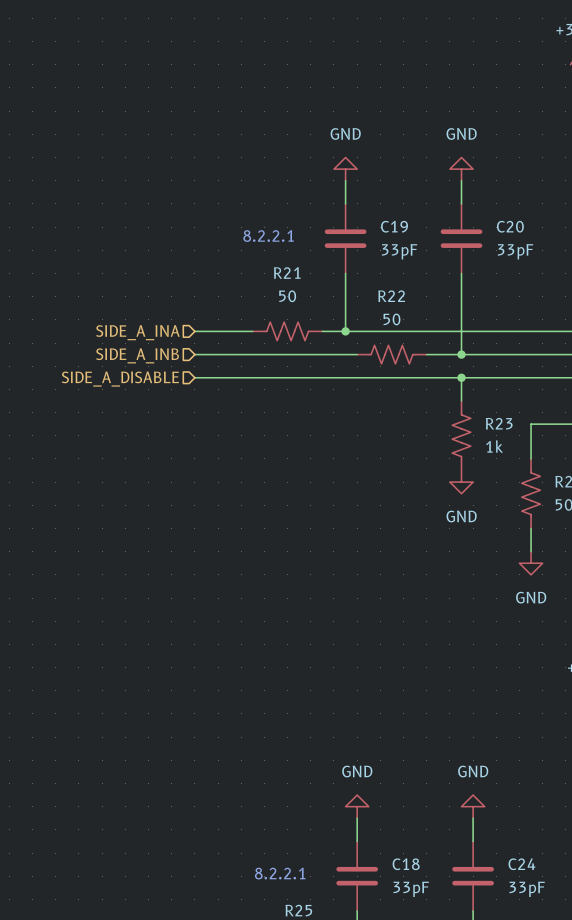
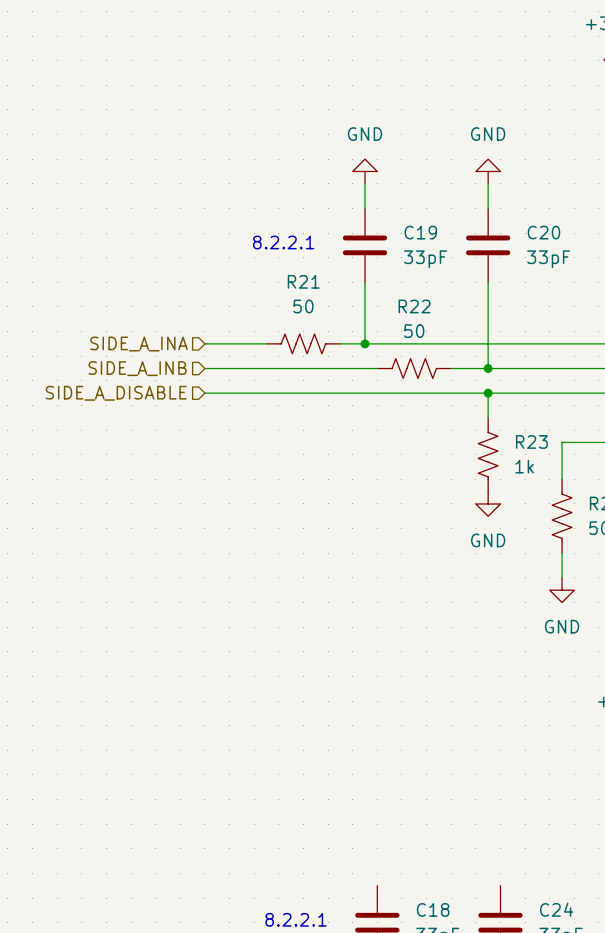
power symbol: GND (357, 806) -> none
power symbol: GND (473, 806) -> none
wire: (357, 818) (357, 841) -> none
wire: (473, 818) (473, 841) -> none

